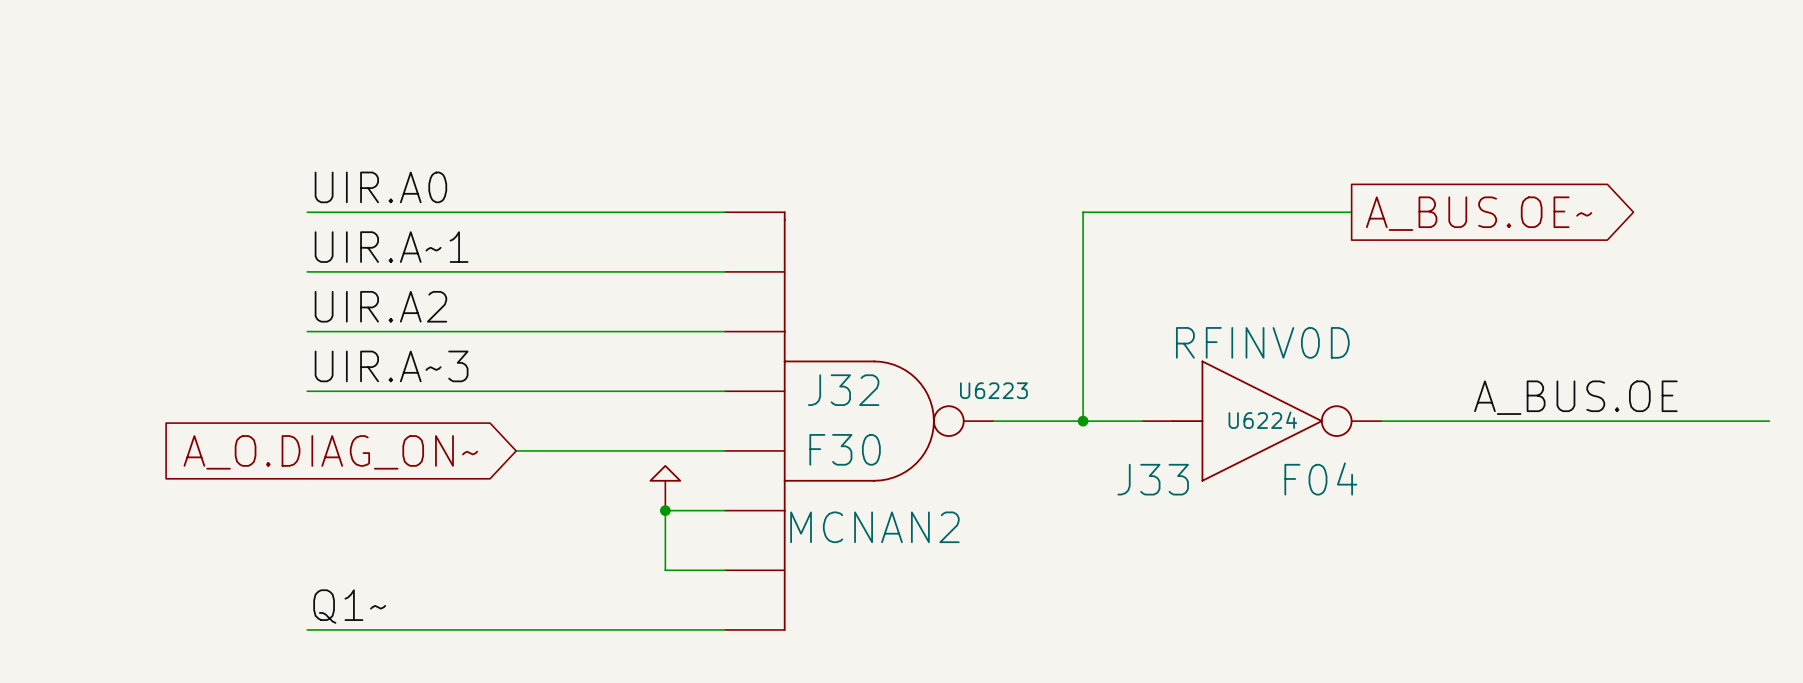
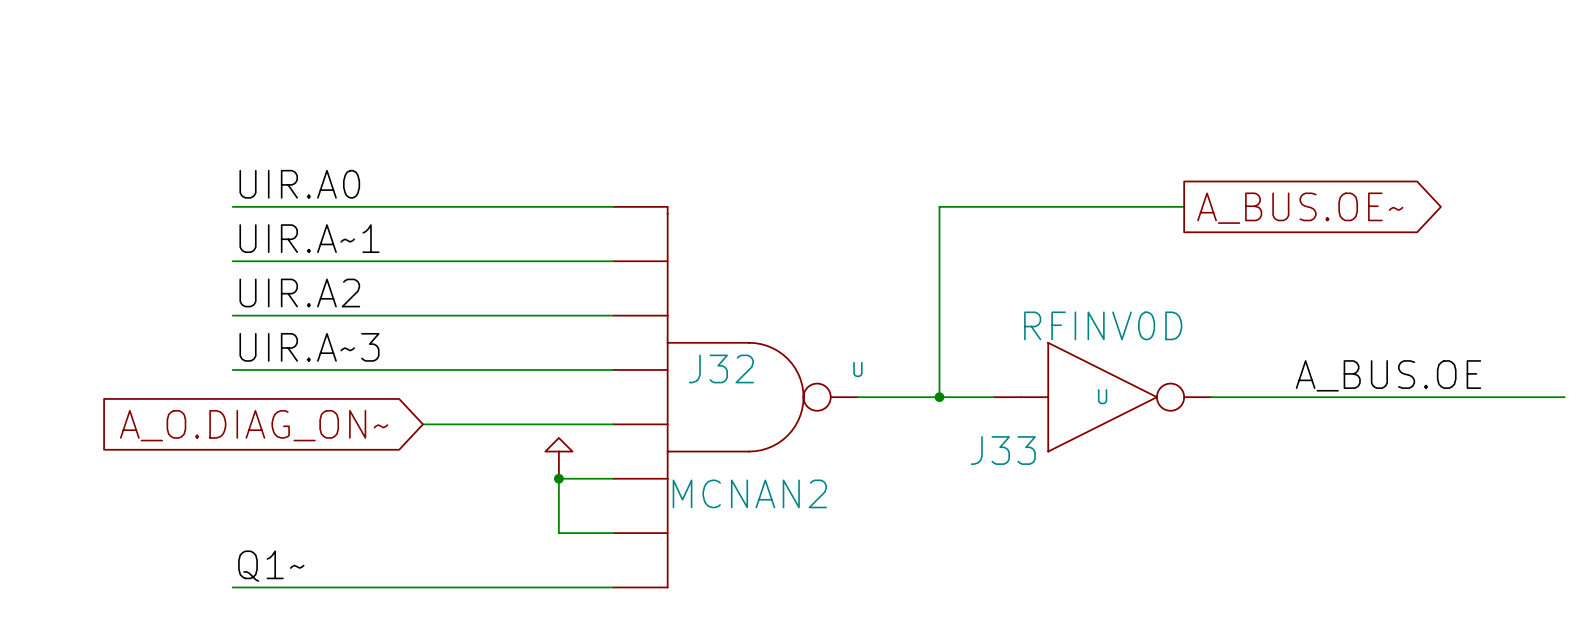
U6223 name: U6223 (993, 390) -> U (857, 369)
U6224 name: U6224 (1262, 420) -> U (1102, 396)
U6223 value: F30 (845, 449) -> none
U6224 value: F04 (1320, 478) -> none

